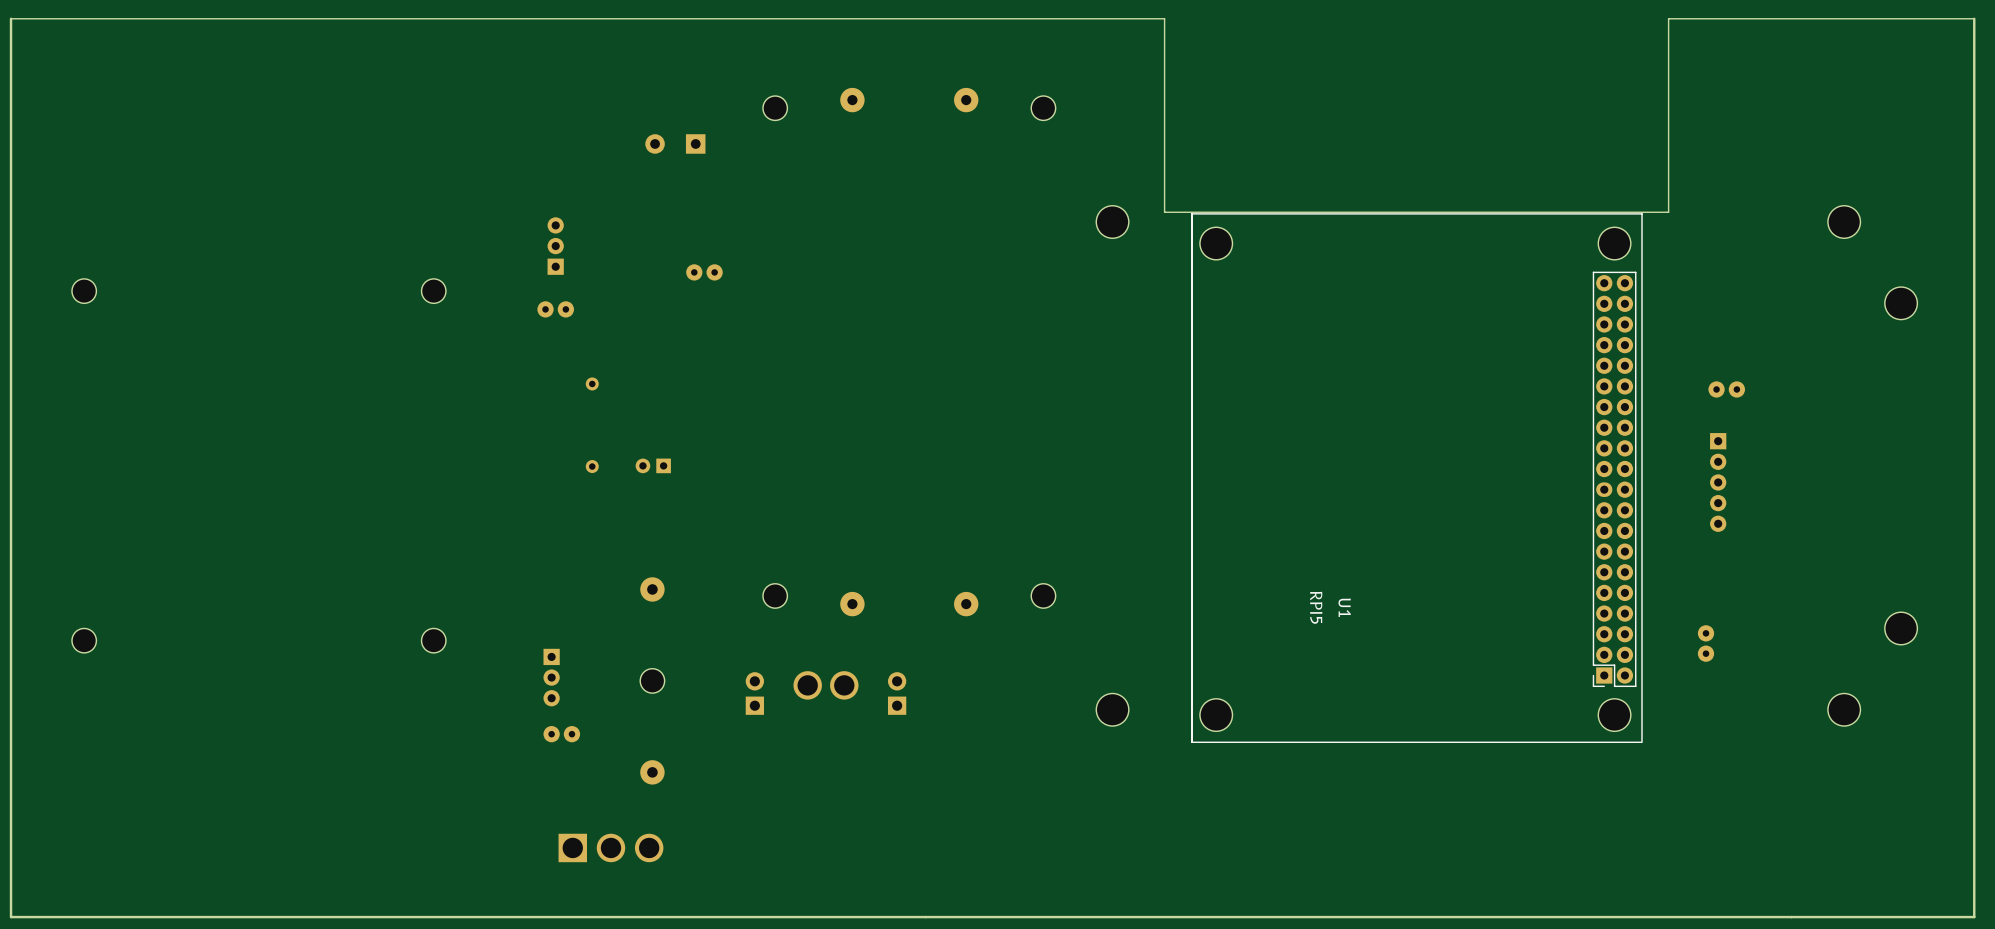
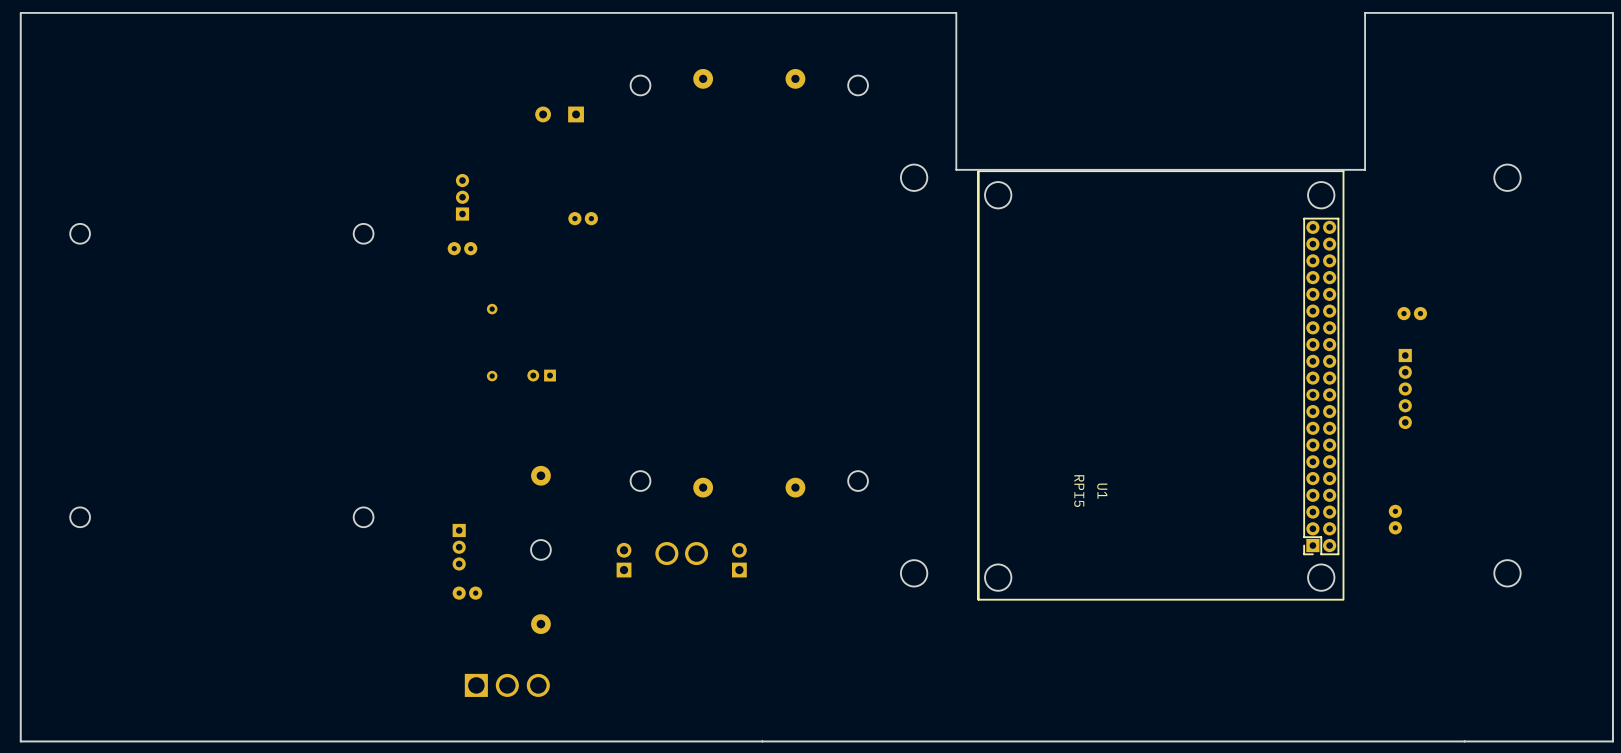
part: (1901, 303) -> none
part: (1901, 628) -> none

